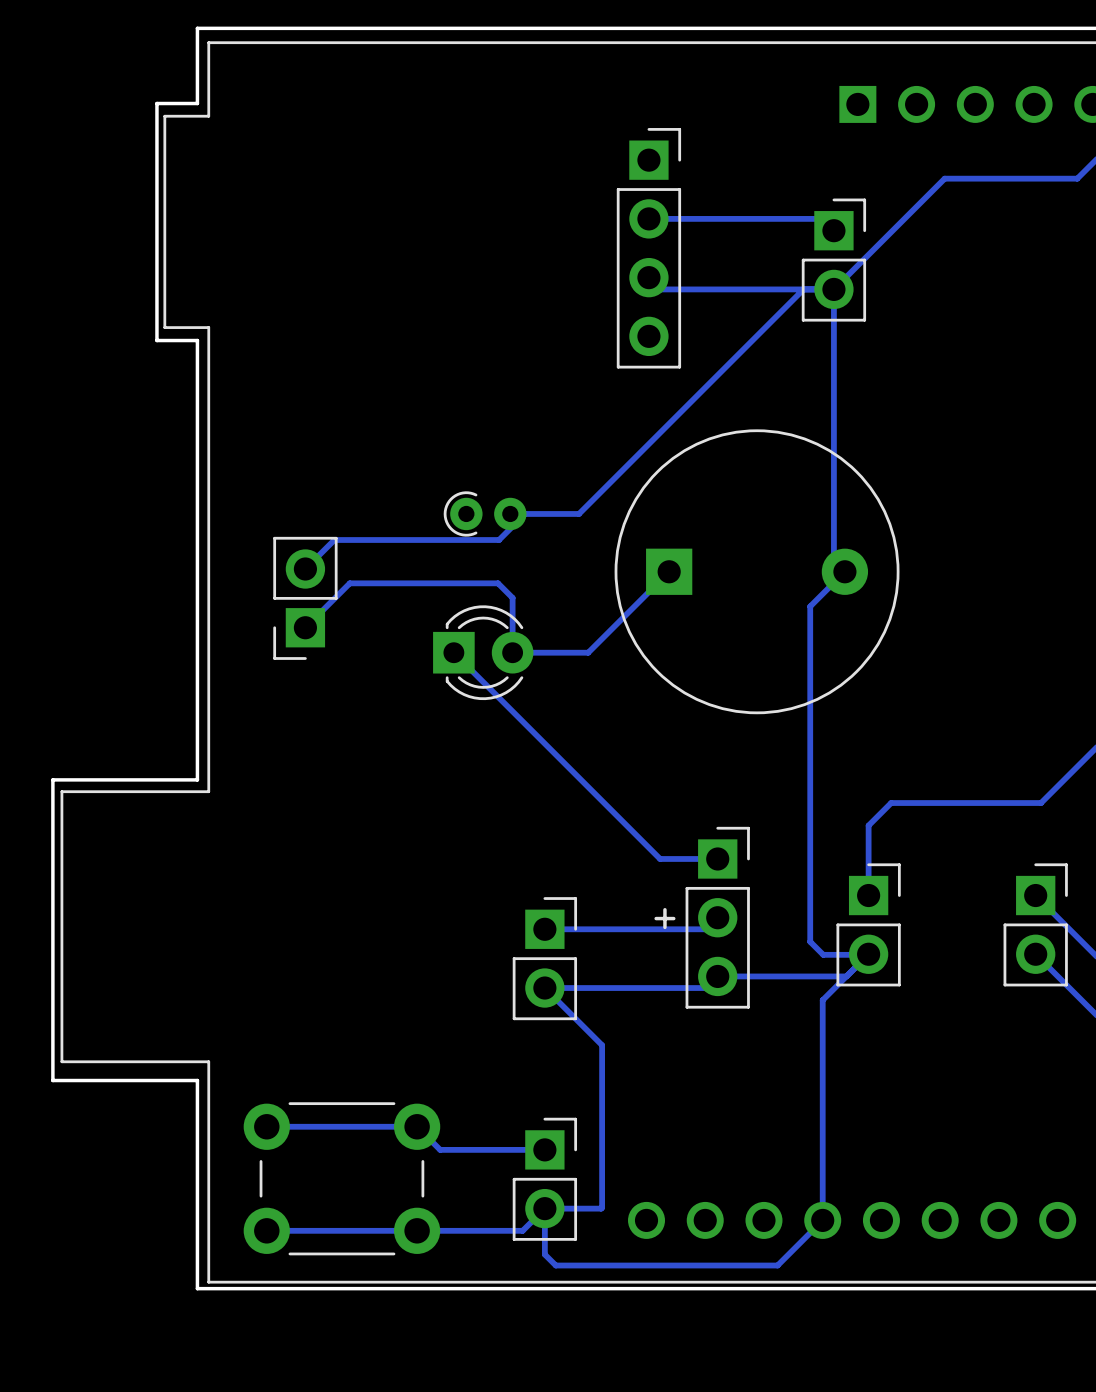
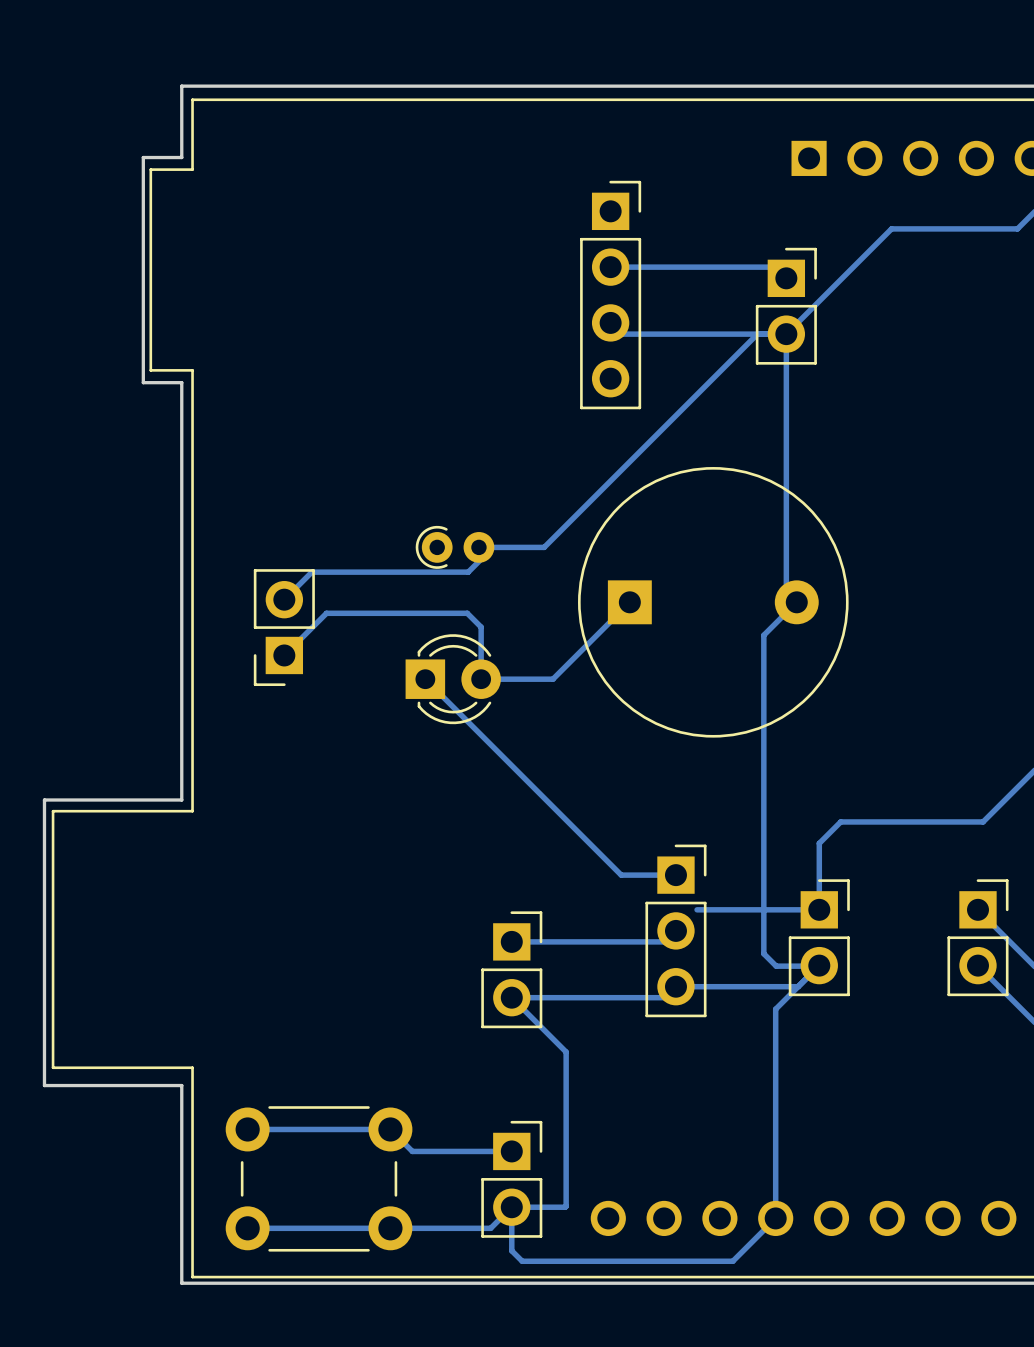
track: none -> (819, 909) (697, 909)
text: + (664, 918) -> none

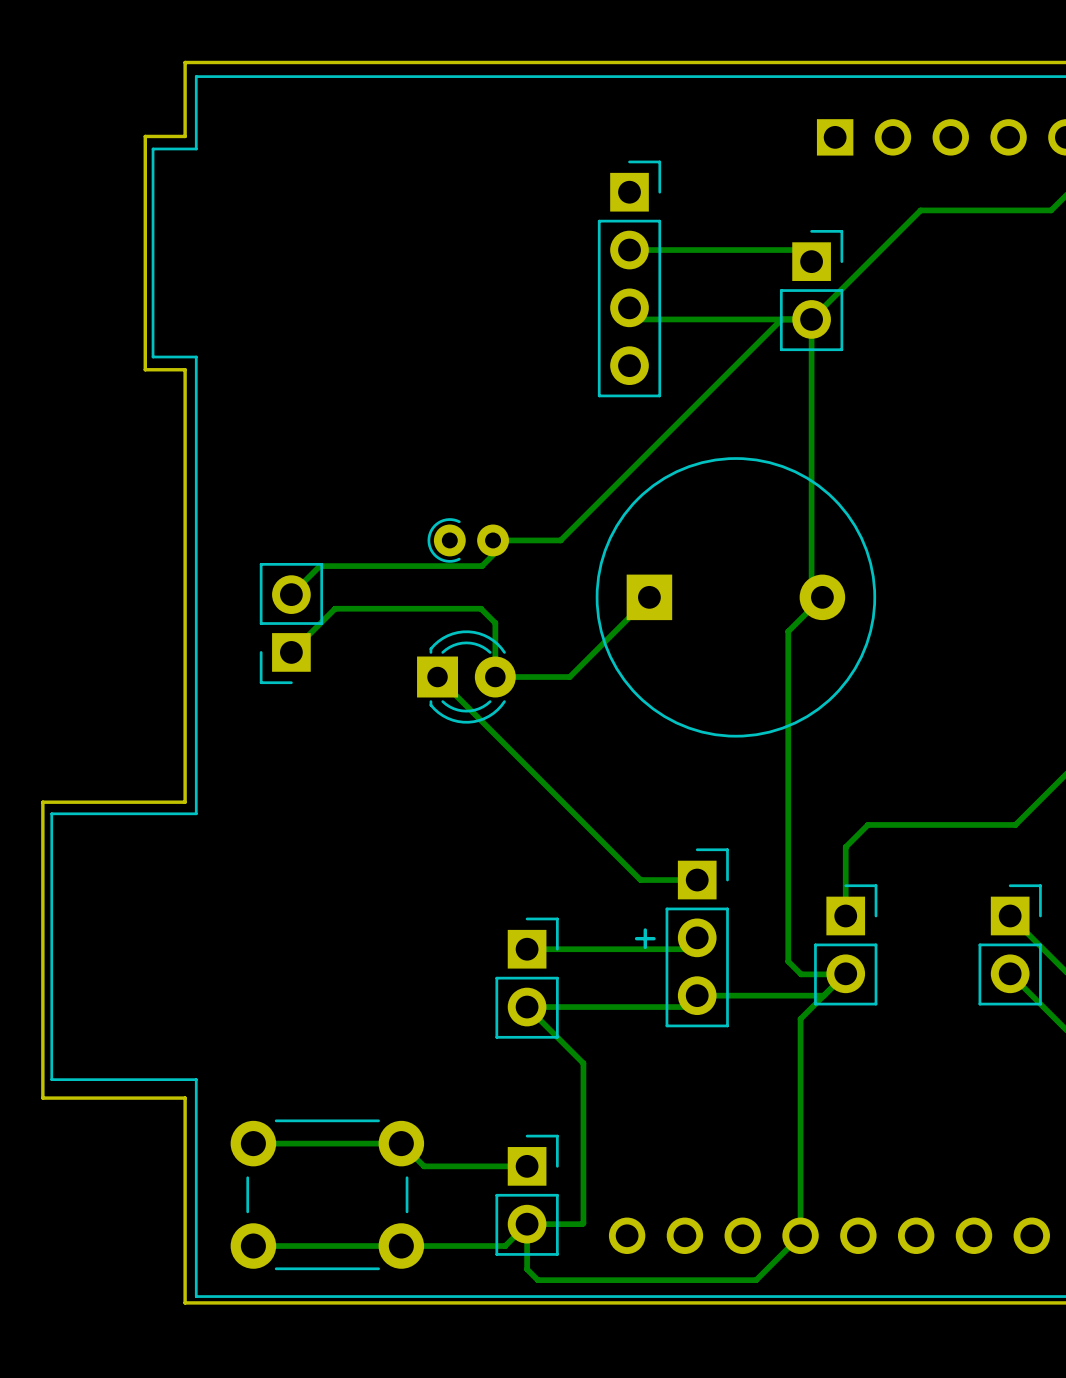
track: (819, 909) (697, 909) -> none
text: none -> + (645, 938)

